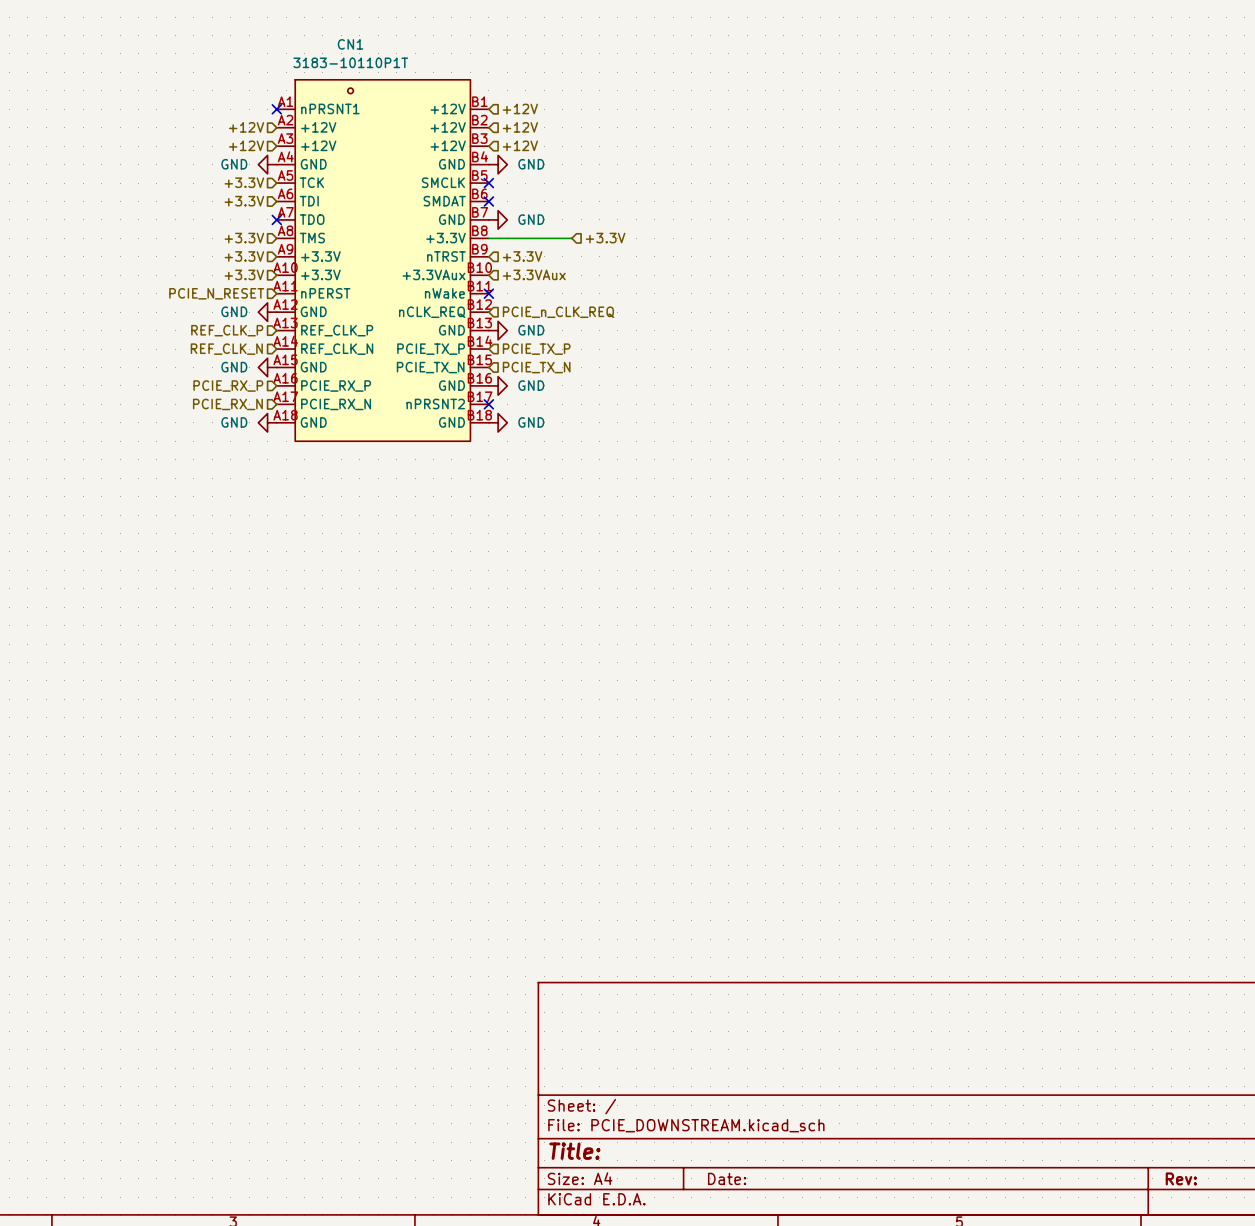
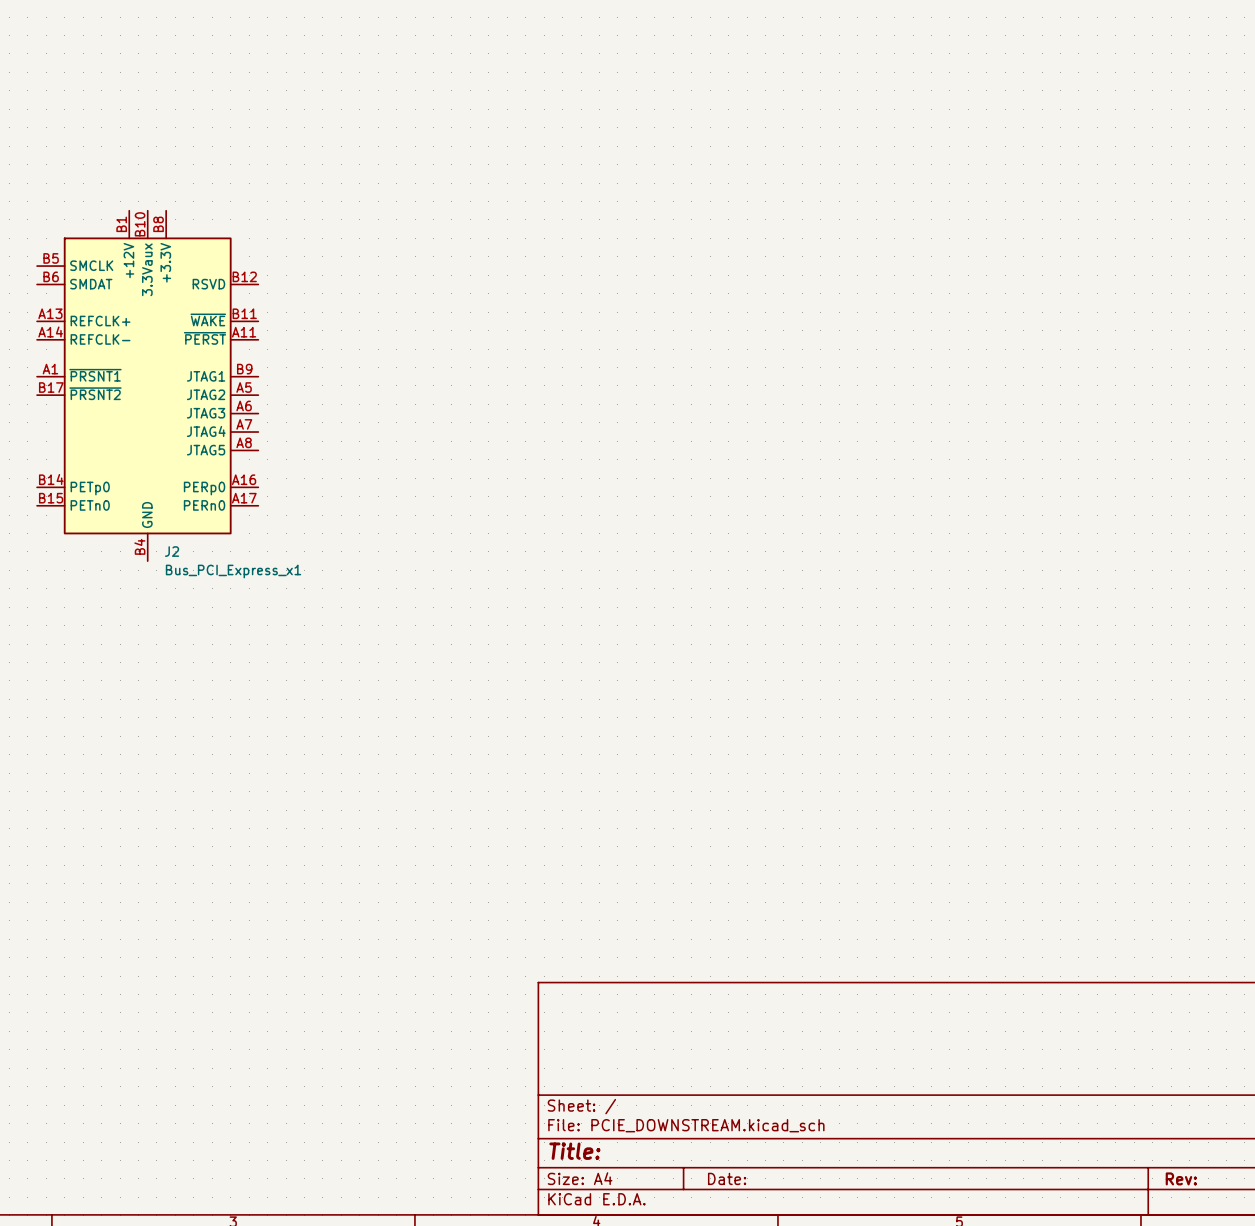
hierarchical label: +12V (520, 108) -> none
no-connect mark: (276, 109) -> none
hierarchical label: +12V (246, 127) -> none
hierarchical label: +12V (520, 127) -> none
hierarchical label: +12V (246, 145) -> none
hierarchical label: +12V (520, 145) -> none
power symbol: GND (267, 164) -> none
power symbol: GND (498, 164) -> none
hierarchical label: +3.3V (244, 182) -> none
no-connect mark: (488, 183) -> none
hierarchical label: +3.3V (244, 201) -> none
no-connect mark: (488, 201) -> none
no-connect mark: (276, 219) -> none
power symbol: GND (498, 219) -> none
hierarchical label: +3.3V (244, 238) -> none
wire: (488, 238) (571, 238) -> none
hierarchical label: +3.3V (605, 238) -> none
hierarchical label: +3.3V (244, 256) -> none
hierarchical label: +3.3V (522, 256) -> none
CN1: 3183-10110P1T (382, 260) -> none
hierarchical label: +3.3V (244, 274) -> none
hierarchical label: +3.3VAux (534, 274) -> none
hierarchical label: PCIE_N_RESET (216, 293) -> none
no-connect mark: (488, 293) -> none
power symbol: GND (267, 312) -> none
hierarchical label: PCIE_n_CLK_REQ (558, 312) -> none
hierarchical label: REF_CLK_P (227, 330) -> none
power symbol: GND (498, 330) -> none
hierarchical label: REF_CLK_N (226, 349) -> none
hierarchical label: PCIE_TX_P (536, 349) -> none
power symbol: GND (267, 367) -> none
hierarchical label: PCIE_TX_N (536, 367) -> none
J2: none -> Bus_PCI_Express_x1 (147, 385)
power symbol: GND (498, 385) -> none
hierarchical label: PCIE_RX_P (228, 386) -> none
hierarchical label: PCIE_RX_N (227, 404) -> none
no-connect mark: (488, 404) -> none
power symbol: GND (267, 422) -> none
power symbol: GND (498, 422) -> none

